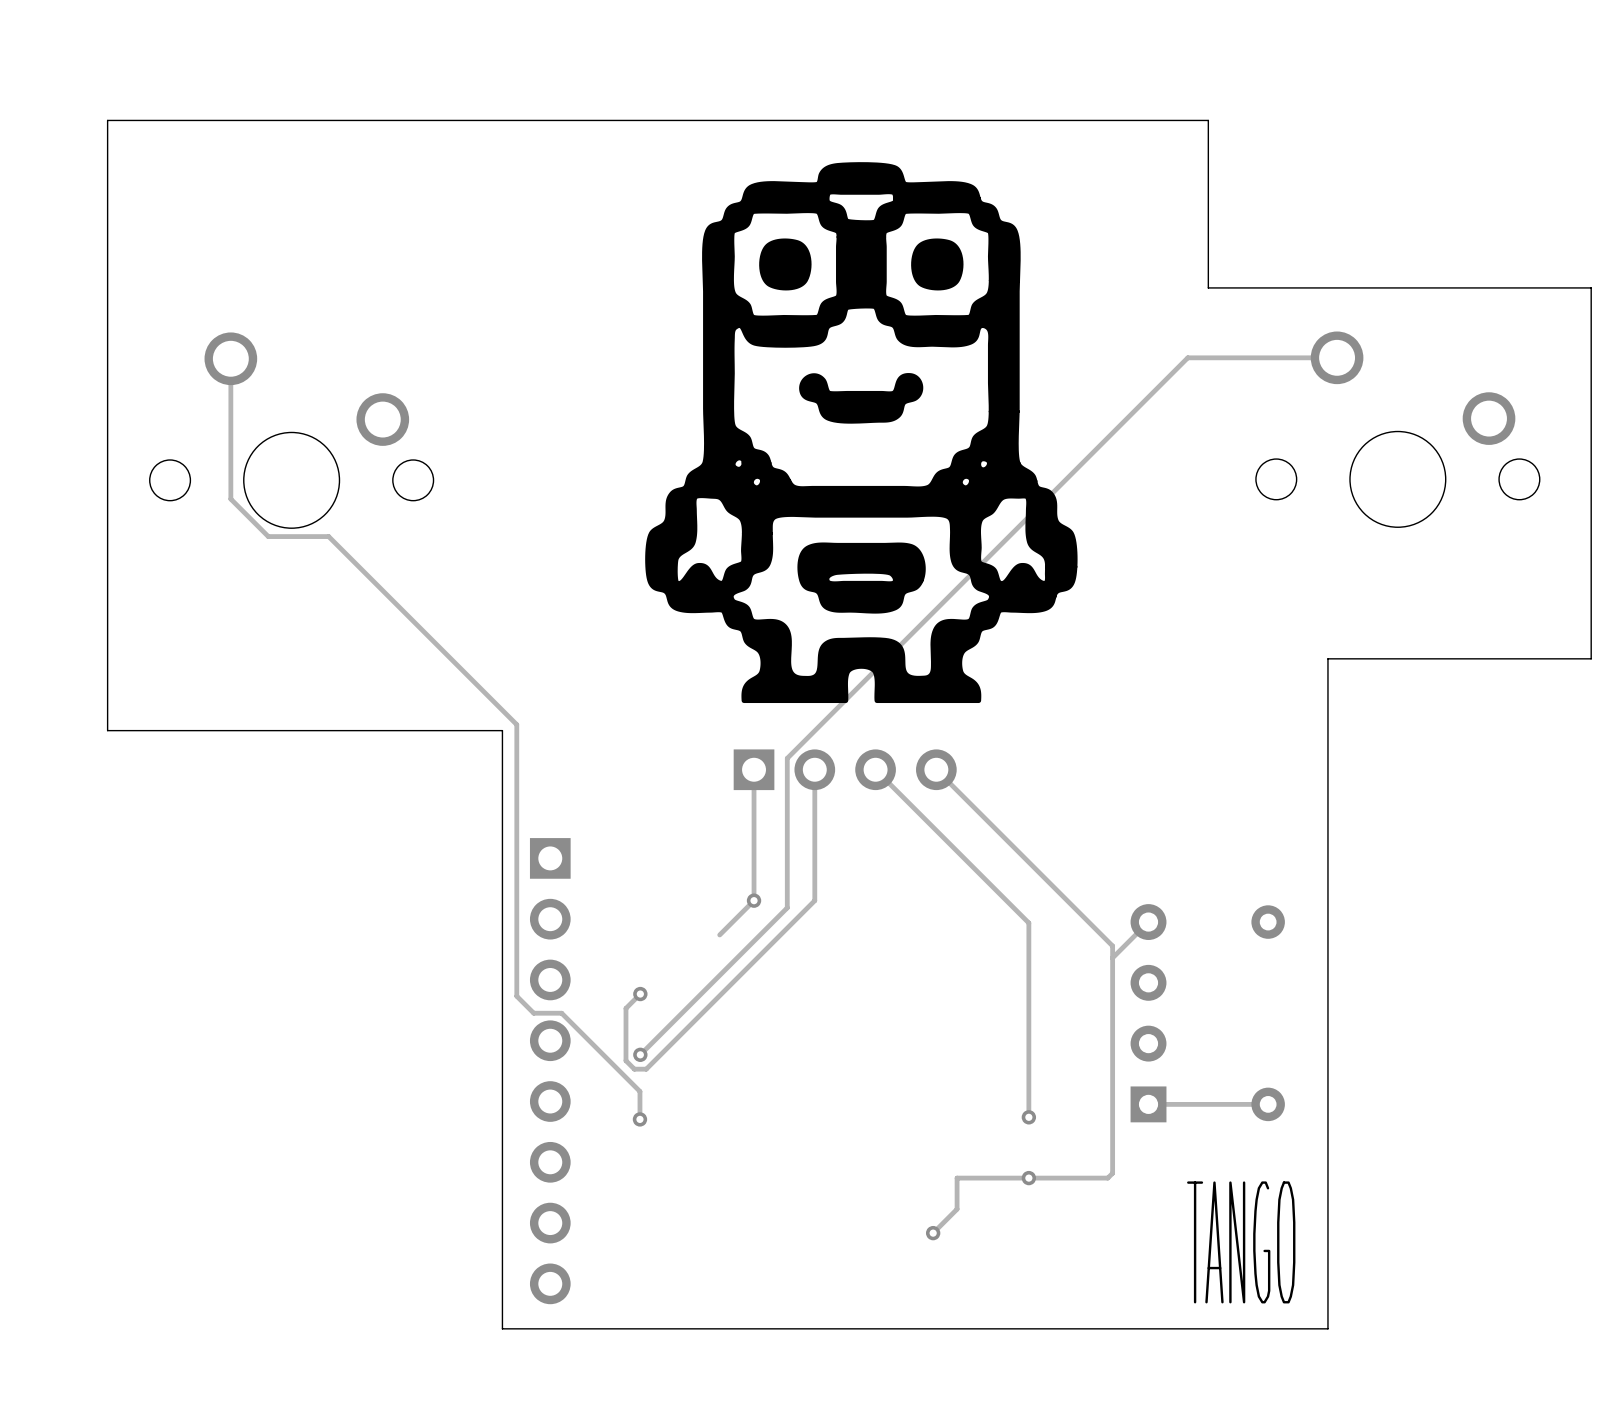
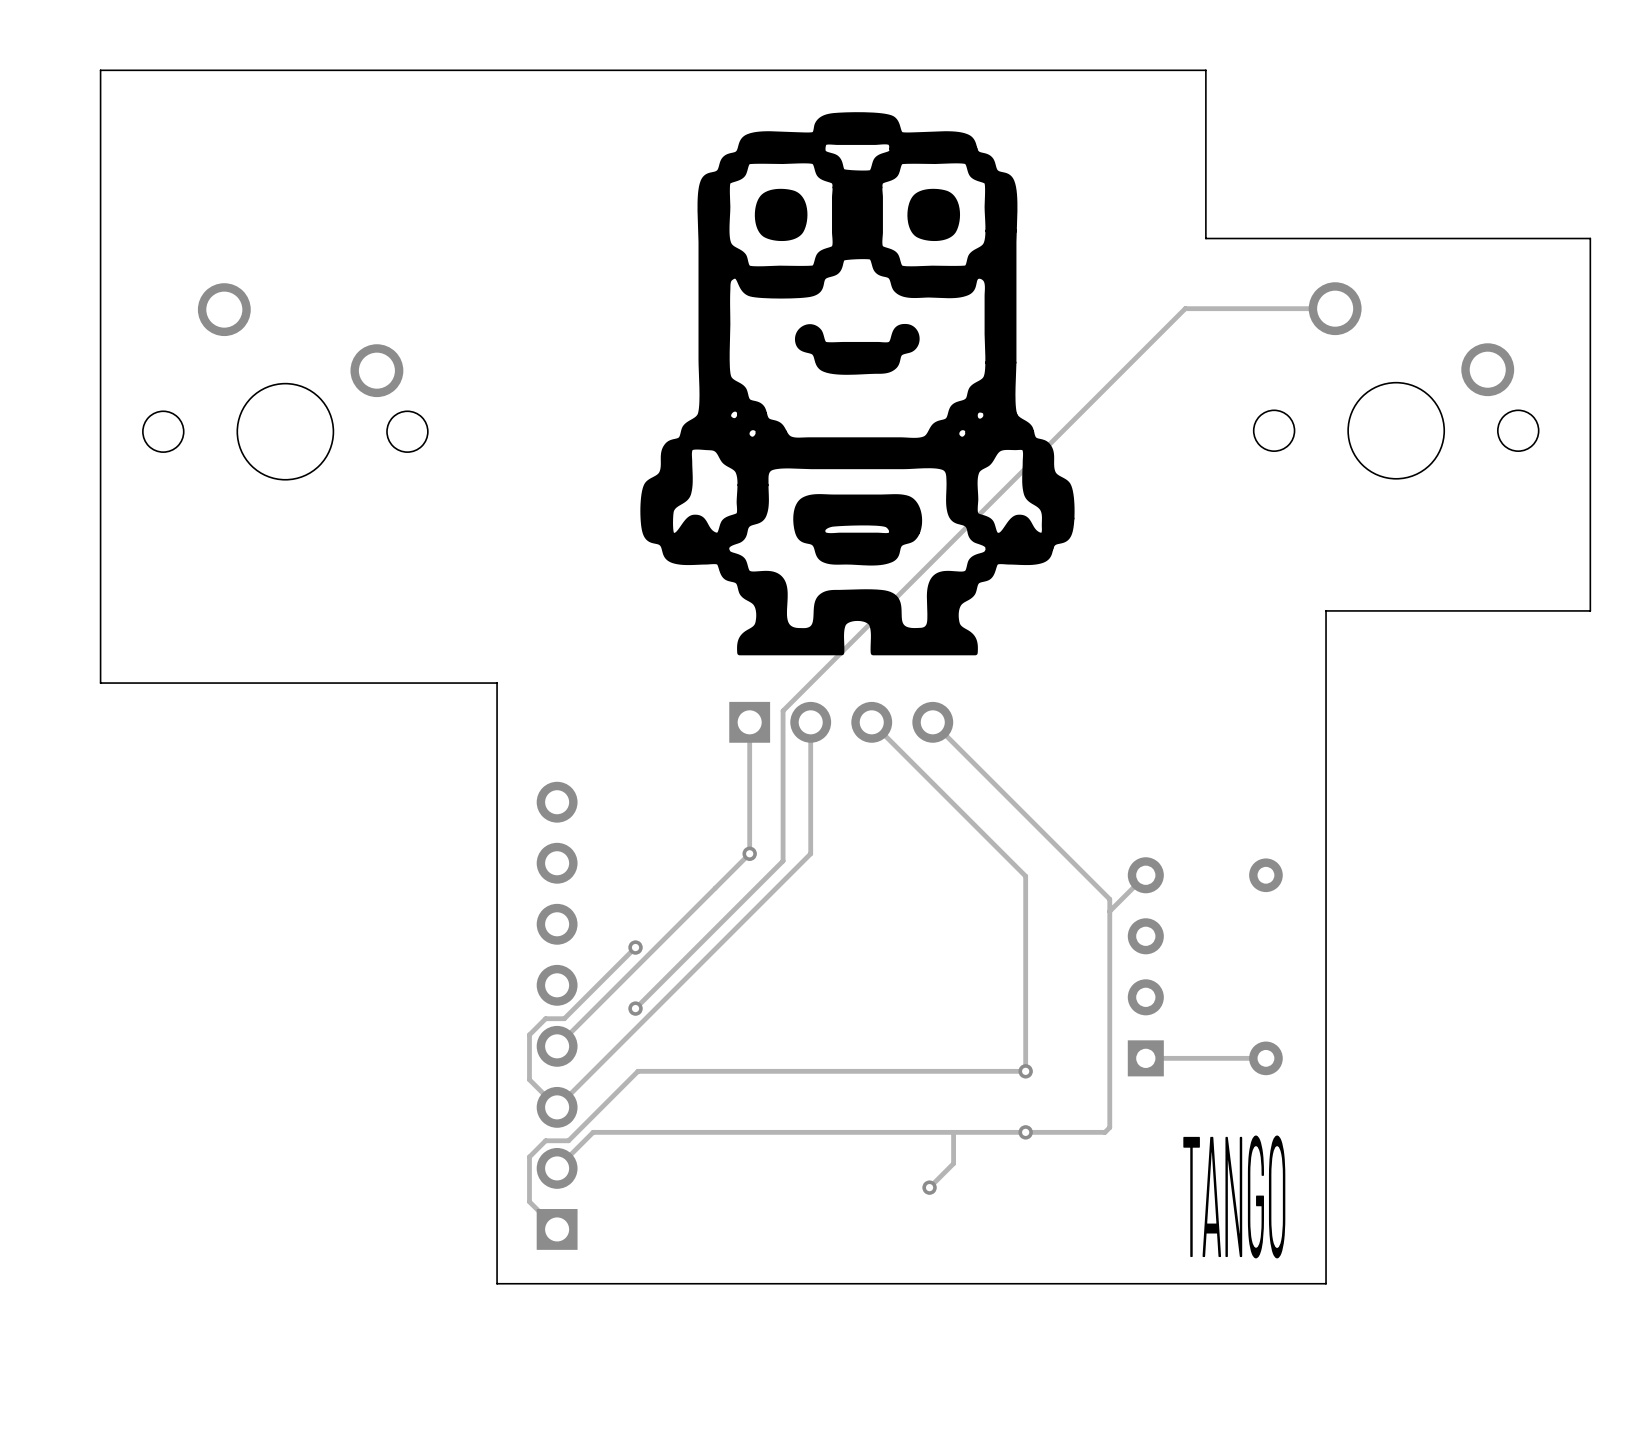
track: (230, 358) (230, 499) (268, 536) (328, 536) (516, 724) (516, 996) (533, 1013) (561, 1013) (639, 1091) (639, 1119) -> none
track: none -> (715, 888) (557, 1046)
track: (625, 1008) (625, 1060) (634, 1069) (646, 1069) -> (621, 961) (564, 1018) (545, 1018) (529, 1034) (529, 1079) (557, 1107) (641, 1022)
part rotation: 0° (550, 1071) -> 180° (557, 1015)
track: none -> (1025, 1071) (638, 1071) (568, 1140) (545, 1140) (529, 1156) (529, 1201) (557, 1229)
via: (639, 1119) -> none
track: none -> (953, 1132) (593, 1132) (557, 1168)

